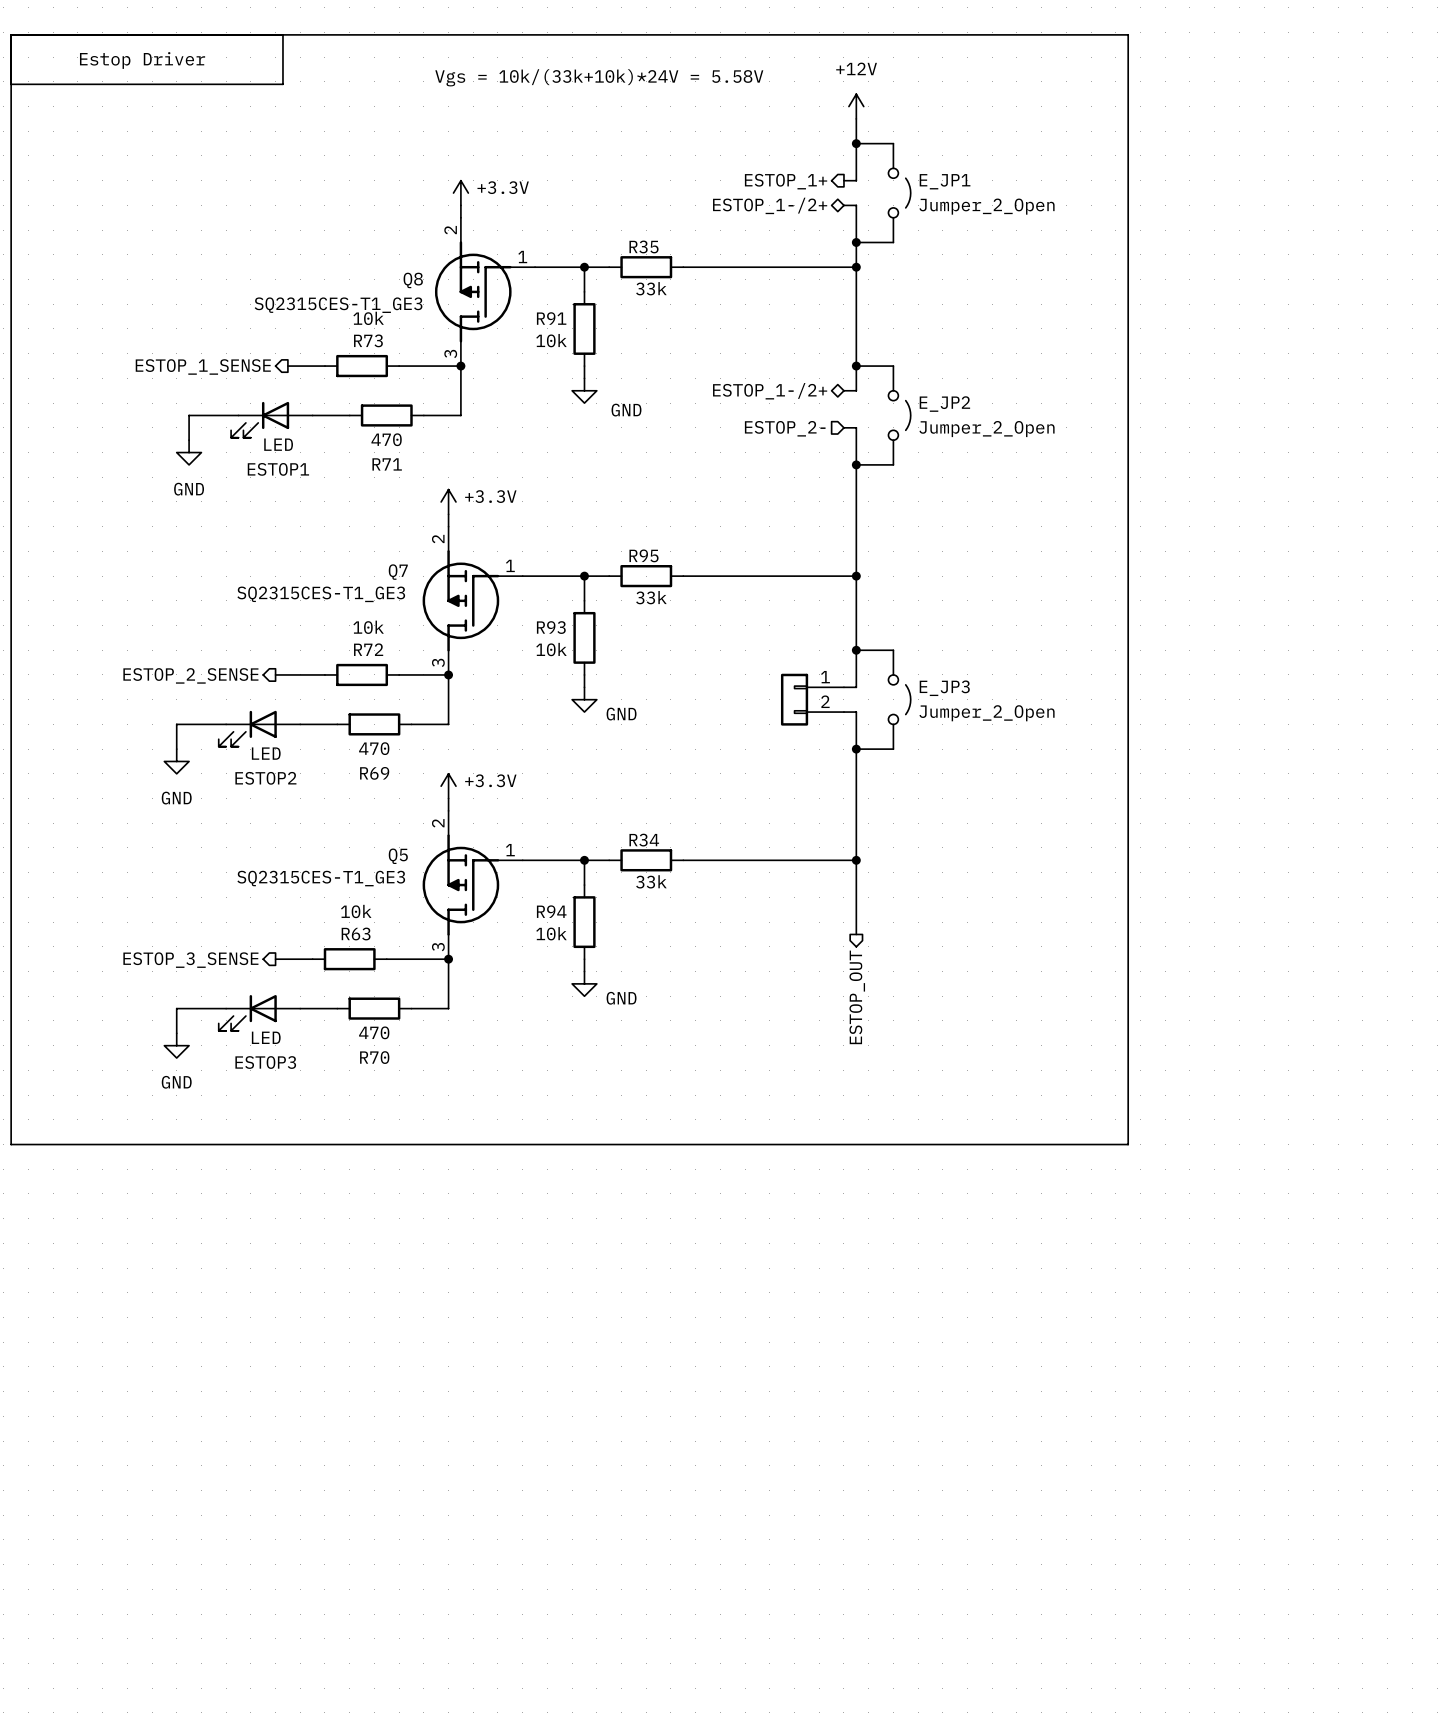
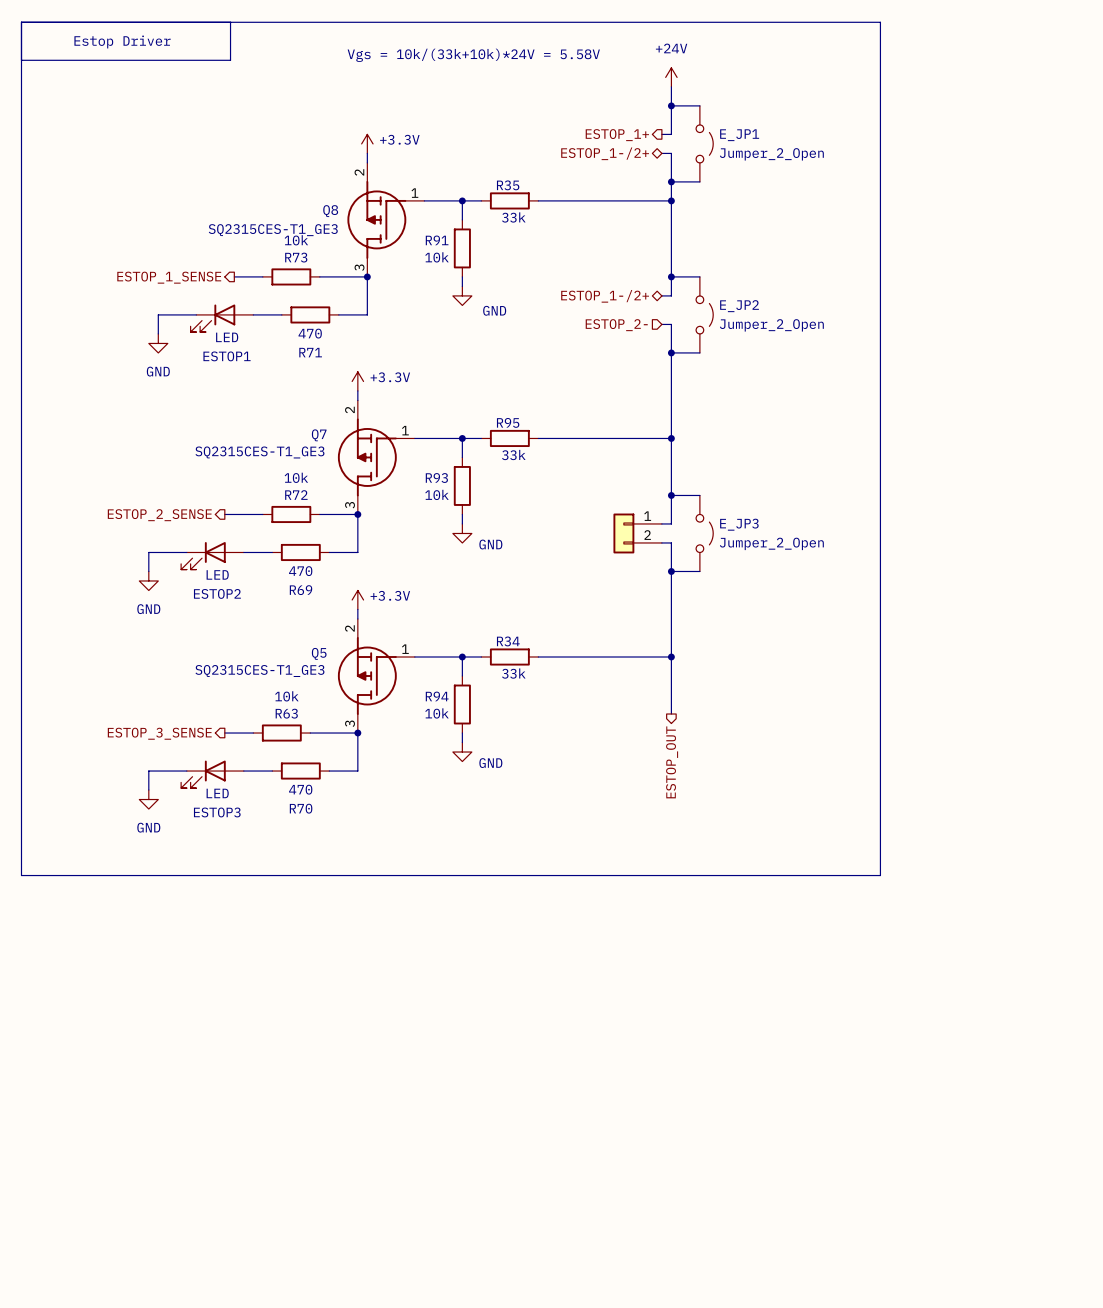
power symbol: +12V (856, 106) -> +24V (671, 77)

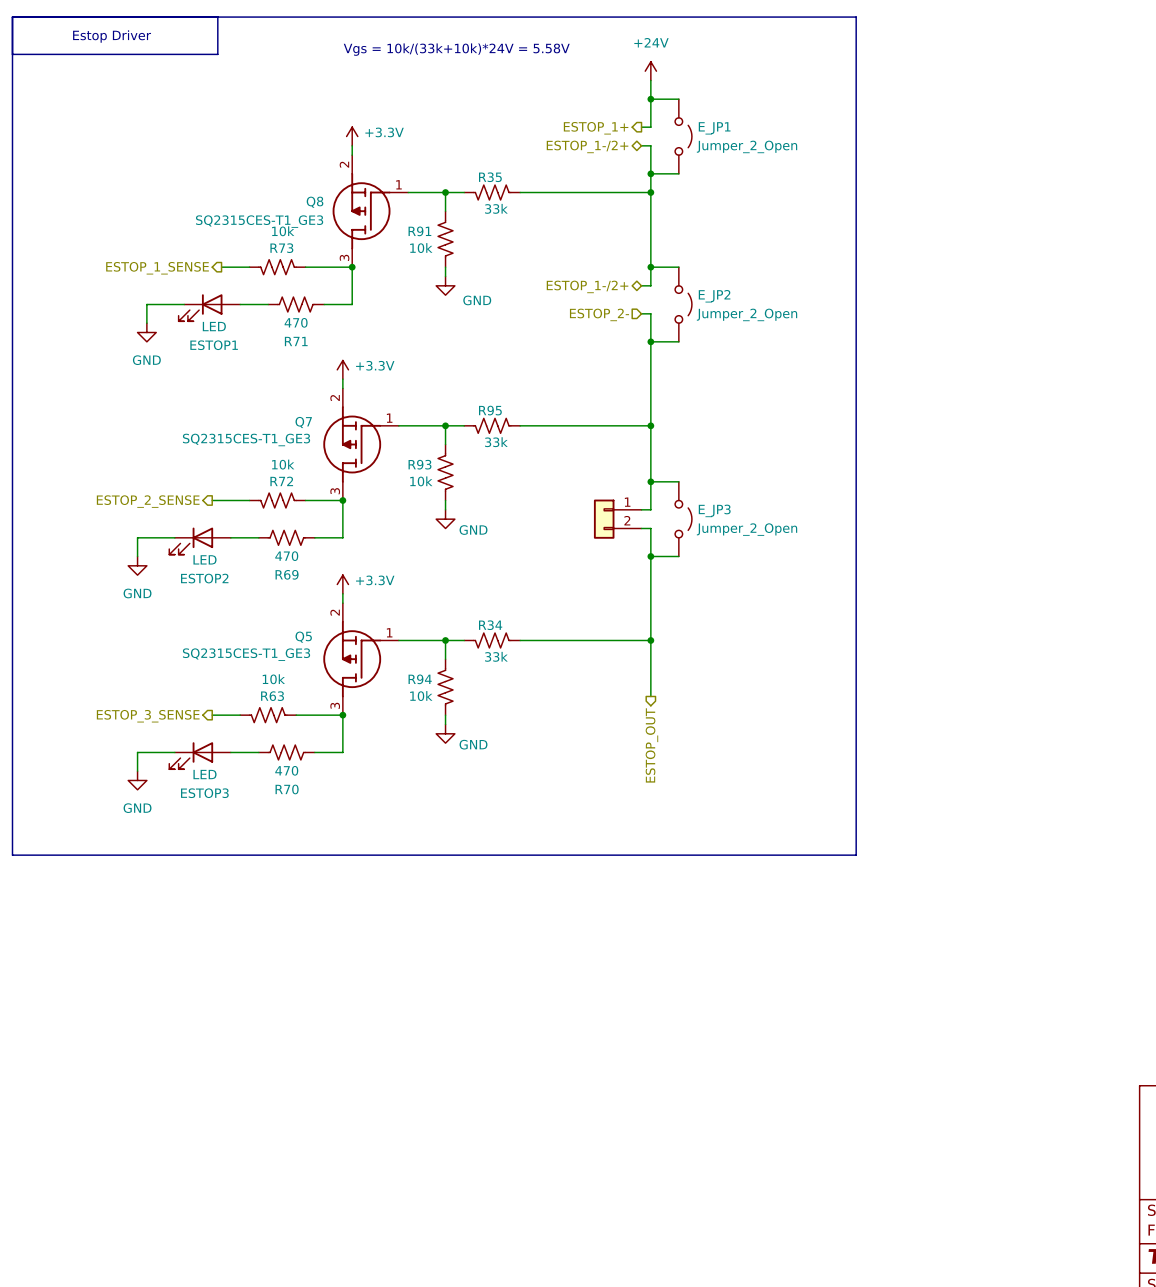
R35 symbol: [481, 192, 539, 210] -> [464, 185, 521, 200]
R91 symbol: [453, 219, 471, 277] -> [438, 211, 454, 268]
R73 symbol: [262, 268, 320, 286] -> [249, 259, 306, 275]
R71 symbol: [281, 306, 339, 324] -> [268, 297, 325, 312]
R95 symbol: [481, 429, 539, 448] -> [464, 418, 521, 434]
R93 symbol: [453, 457, 471, 515] -> [438, 444, 454, 501]
R72 symbol: [262, 505, 320, 524] -> [249, 493, 306, 508]
R69 symbol: [272, 543, 330, 562] -> [258, 530, 315, 546]
R34 symbol: [481, 648, 539, 666] -> [464, 633, 521, 648]
R94 symbol: [453, 676, 471, 734] -> [438, 659, 454, 716]
R63 symbol: [253, 724, 311, 742] -> [240, 707, 297, 723]
R70 symbol: [272, 762, 330, 780] -> [258, 745, 315, 760]

